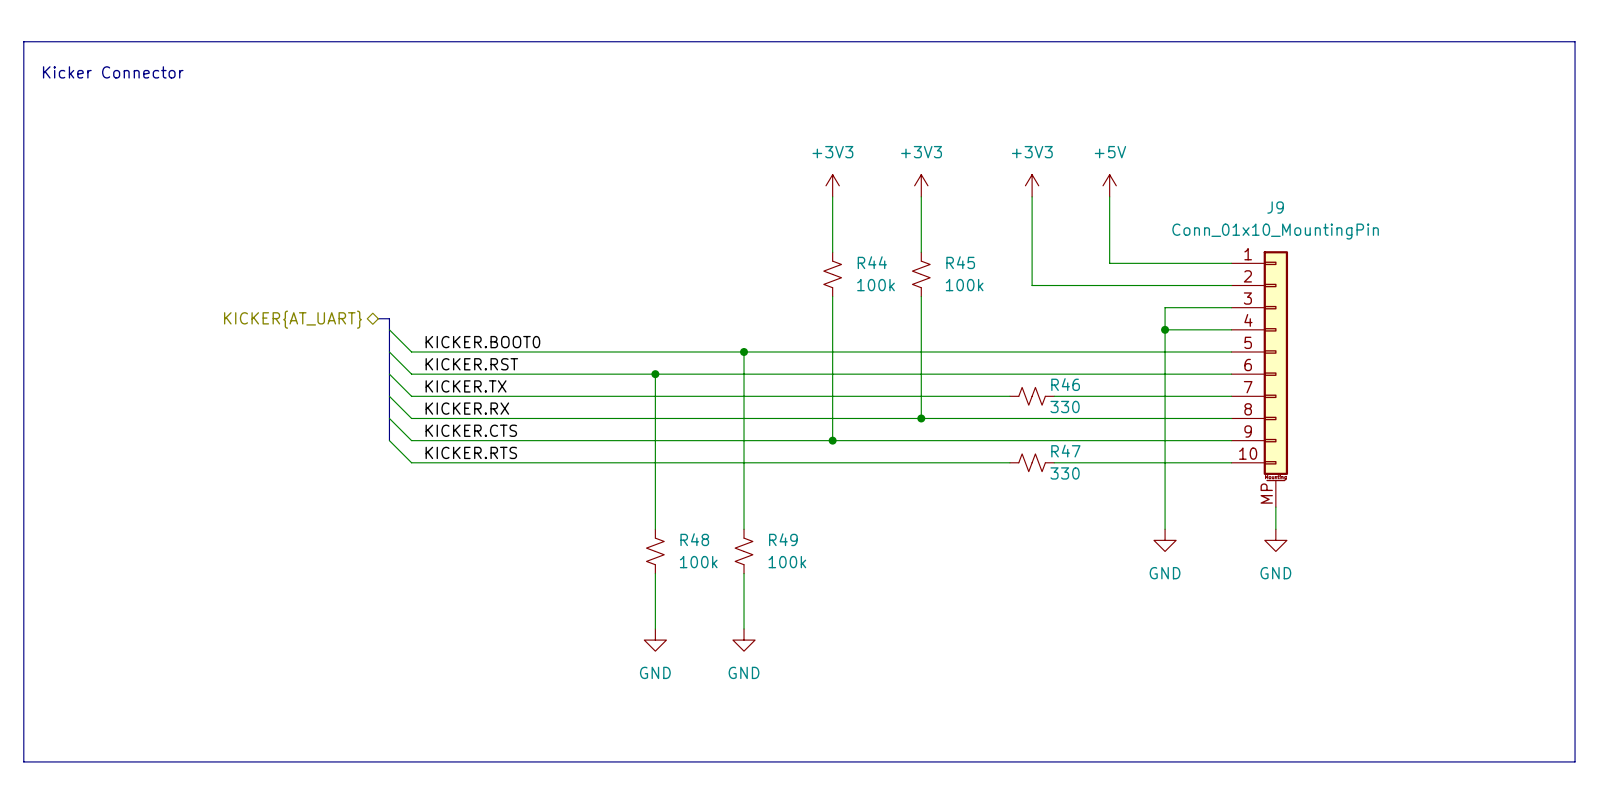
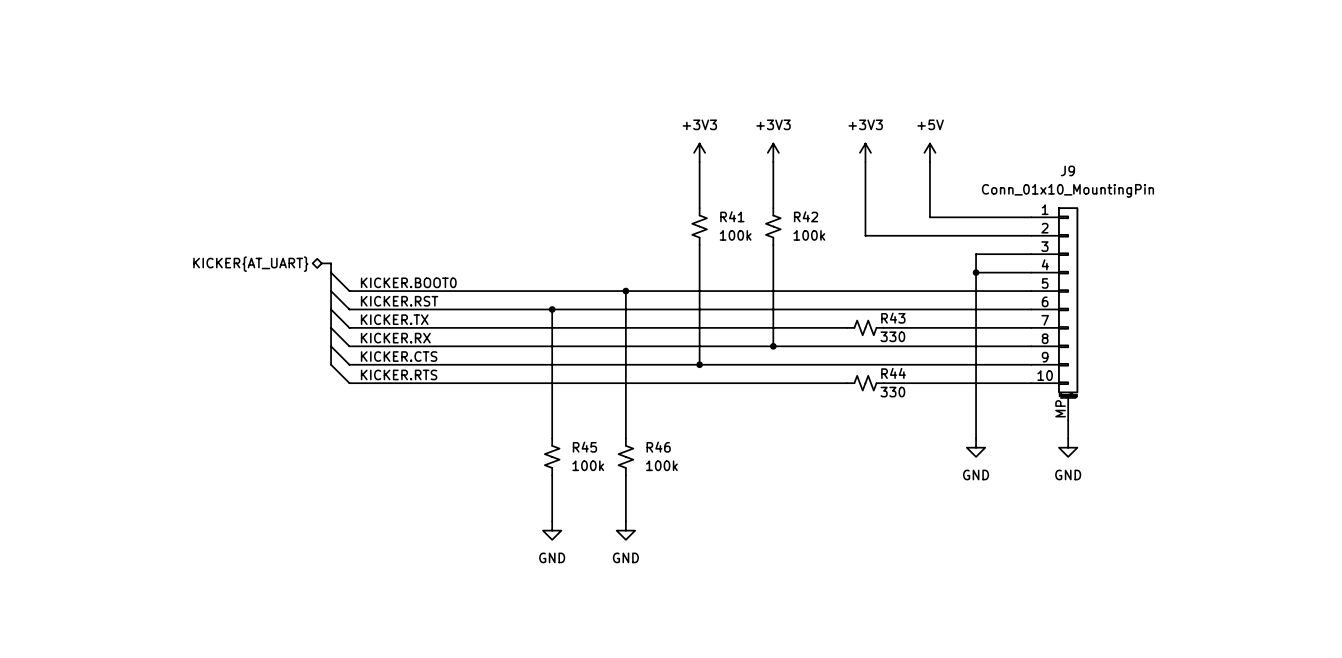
line: (23, 41) (1575, 41) (1575, 761) (23, 761) (23, 41) -> none
text: Kicker Connector (113, 72) -> none
R44 name: R44 (872, 262) -> R41 (732, 216)
R45 name: R45 (960, 262) -> R42 (806, 216)
R46 name: R46 (1065, 384) -> R43 (893, 318)
R47 name: R47 (1065, 451) -> R44 (893, 373)
R48 name: R48 (694, 539) -> R45 (584, 447)
R49 name: R49 (783, 539) -> R46 (658, 447)

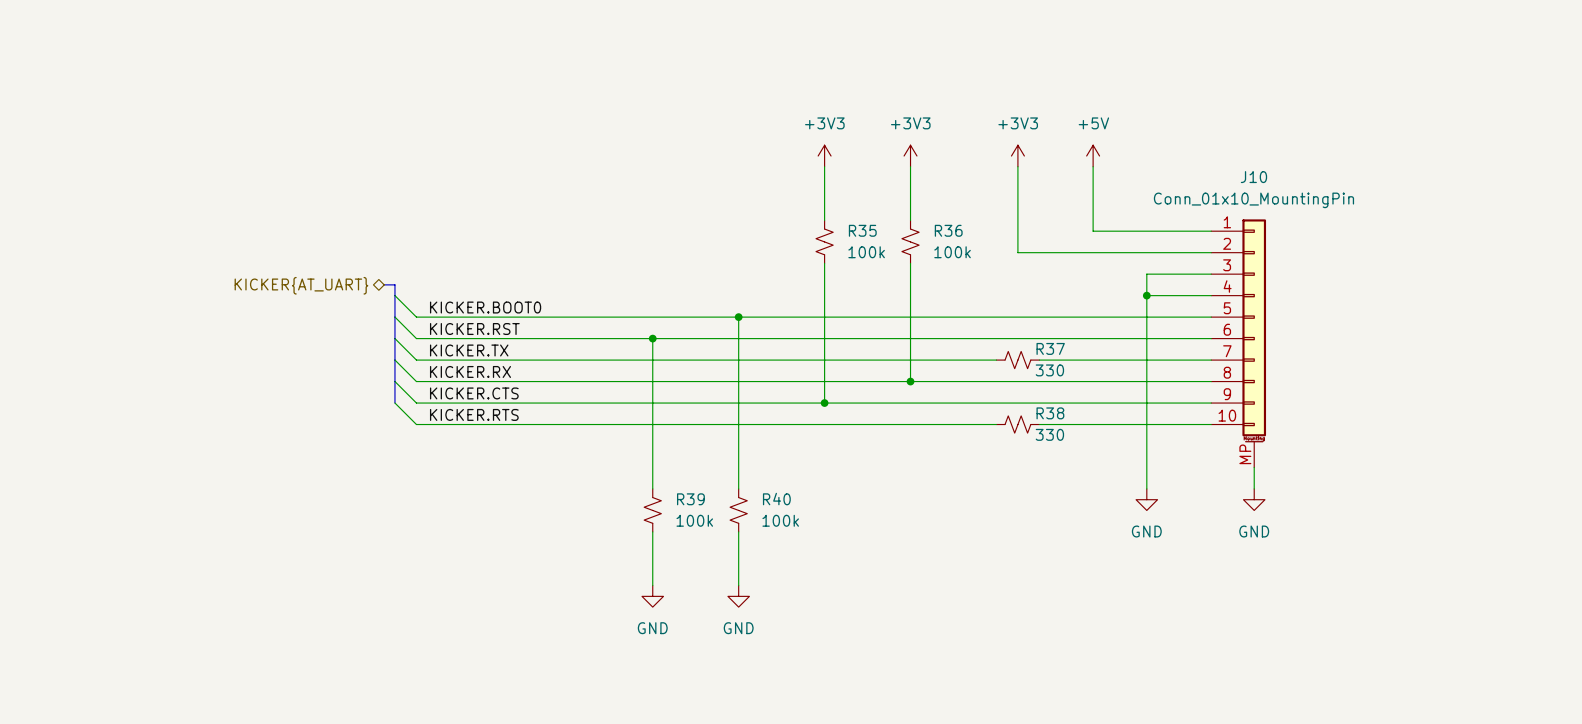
J9 name: J9 (1067, 170) -> J10 (1253, 177)
R41 name: R41 (732, 216) -> R35 (862, 230)
R42 name: R42 (806, 216) -> R36 (948, 230)
R43 name: R43 (893, 318) -> R37 (1050, 348)
R44 name: R44 (893, 373) -> R38 (1050, 413)
R45 name: R45 (584, 447) -> R39 (690, 499)
R46 name: R46 (658, 447) -> R40 (776, 499)

